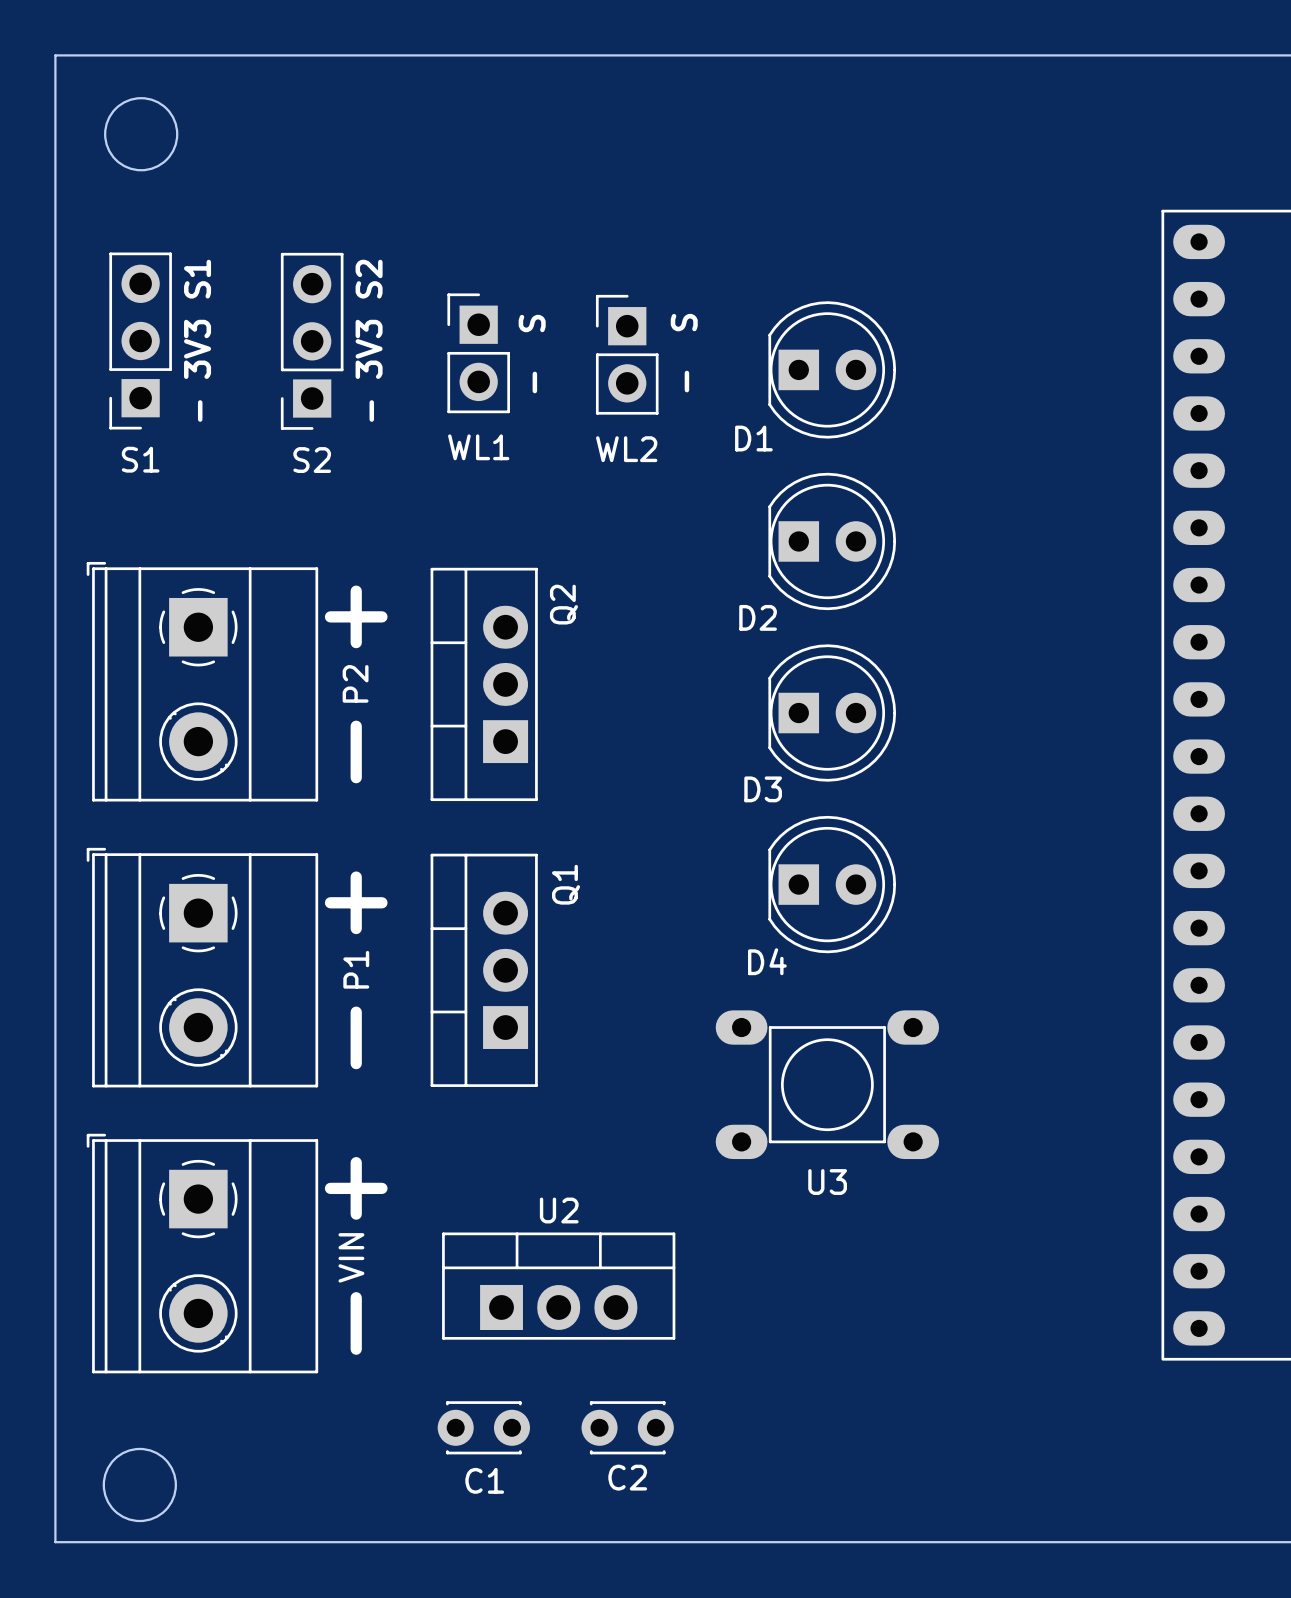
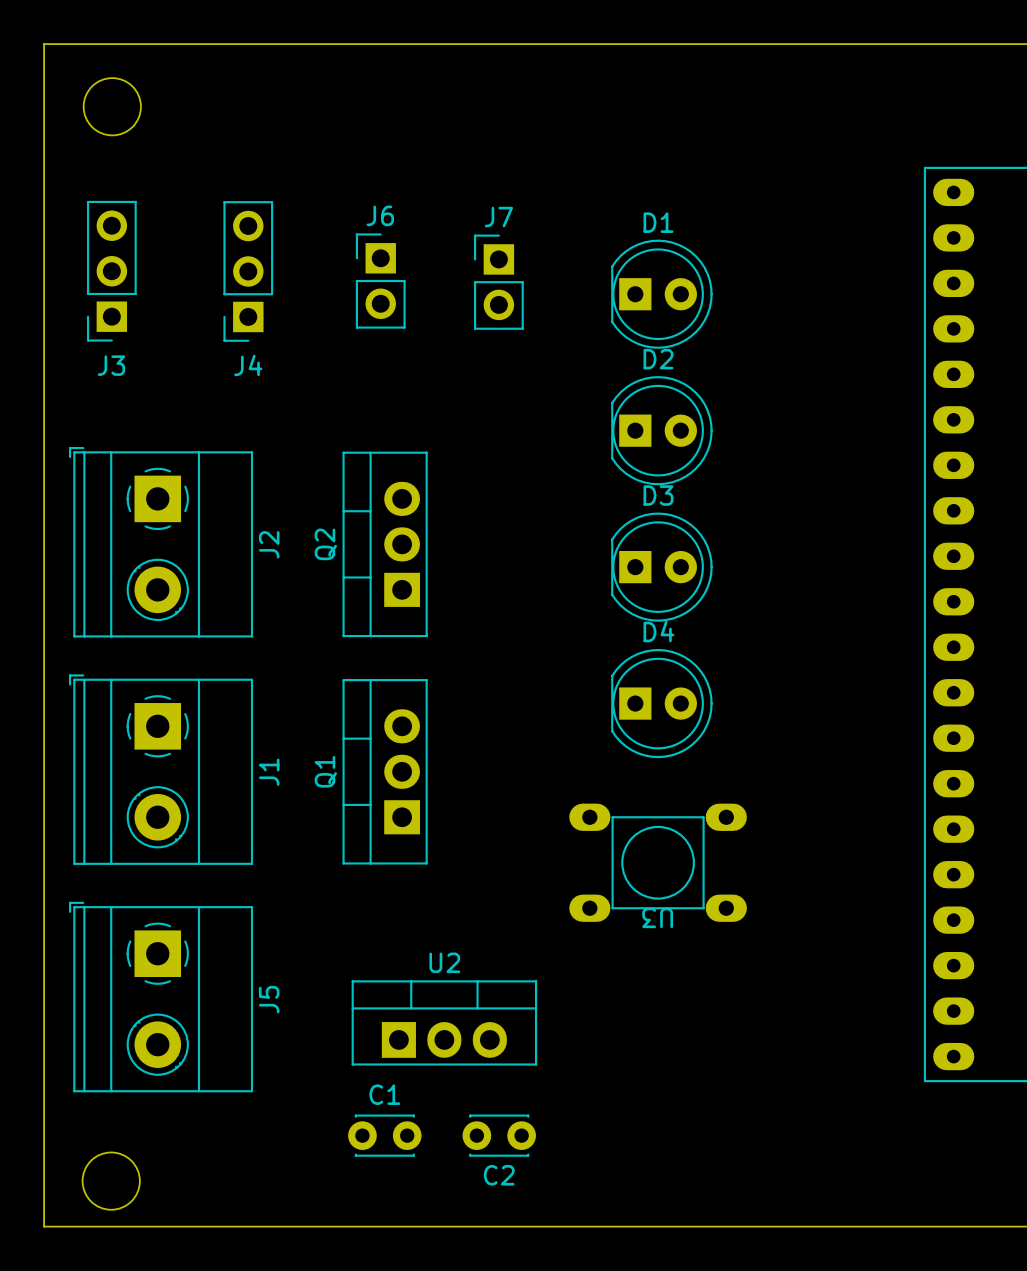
text: - 3V3 S1 (197, 340) -> none
text: - 3V3 S2 (369, 340) -> none
text: - S (684, 353) -> none
text: - S (532, 354) -> none
D1 name position: D1 (753, 438) -> D1 (658, 222)
WL1 name: WL1 (478, 447) -> J6 (380, 215)
WL2 name: WL2 (626, 449) -> J7 (498, 217)
S1 name: S1 (140, 459) -> J3 (111, 365)
S2 name: S2 (312, 460) -> J4 (248, 365)
Q2 name position: Q2 (563, 604) -> Q2 (325, 544)
D2 name position: D2 (758, 617) -> D2 (658, 359)
P2 name: P2 (355, 683) -> J2 (269, 544)
text: + - (356, 684) -> none
D3 name position: D3 (763, 789) -> D3 (658, 495)
Q1 name position: Q1 (566, 884) -> Q1 (325, 771)
D4 name position: D4 (767, 961) -> D4 (658, 631)
P1 name: P1 (356, 969) -> J1 (269, 772)
text: + - (356, 970) -> none
U3 name rotation: 0° (827, 1182) -> 180° (657, 917)
text: + - (356, 1255) -> none
VIN name: VIN (351, 1257) -> J5 (269, 999)
C1 name position: C1 (484, 1480) -> C1 (384, 1094)

